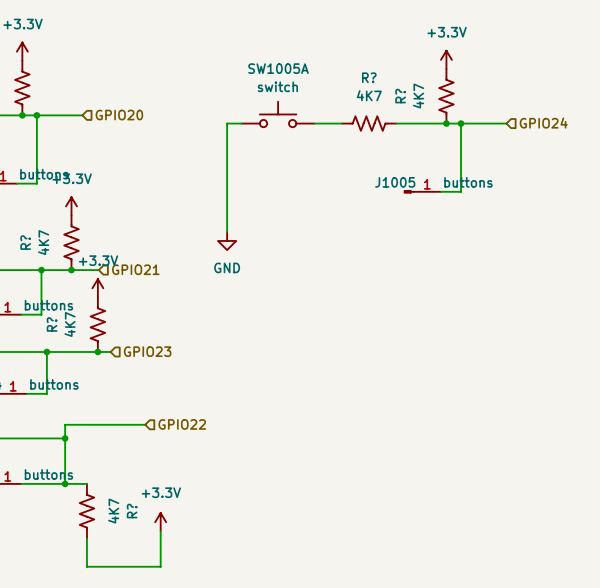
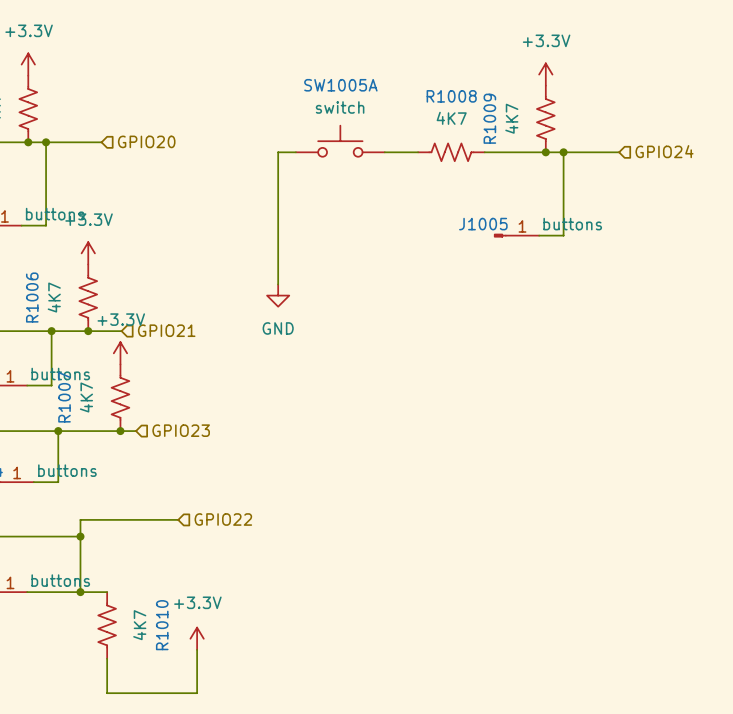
R? name: R? (369, 77) -> R1008 (451, 96)
R? name: R? (400, 96) -> R1009 (489, 118)
R? name: R? (25, 242) -> R1006 (32, 297)
R? name: R? (52, 324) -> R1007 (64, 397)
R? name: R? (132, 511) -> R1010 (162, 625)

